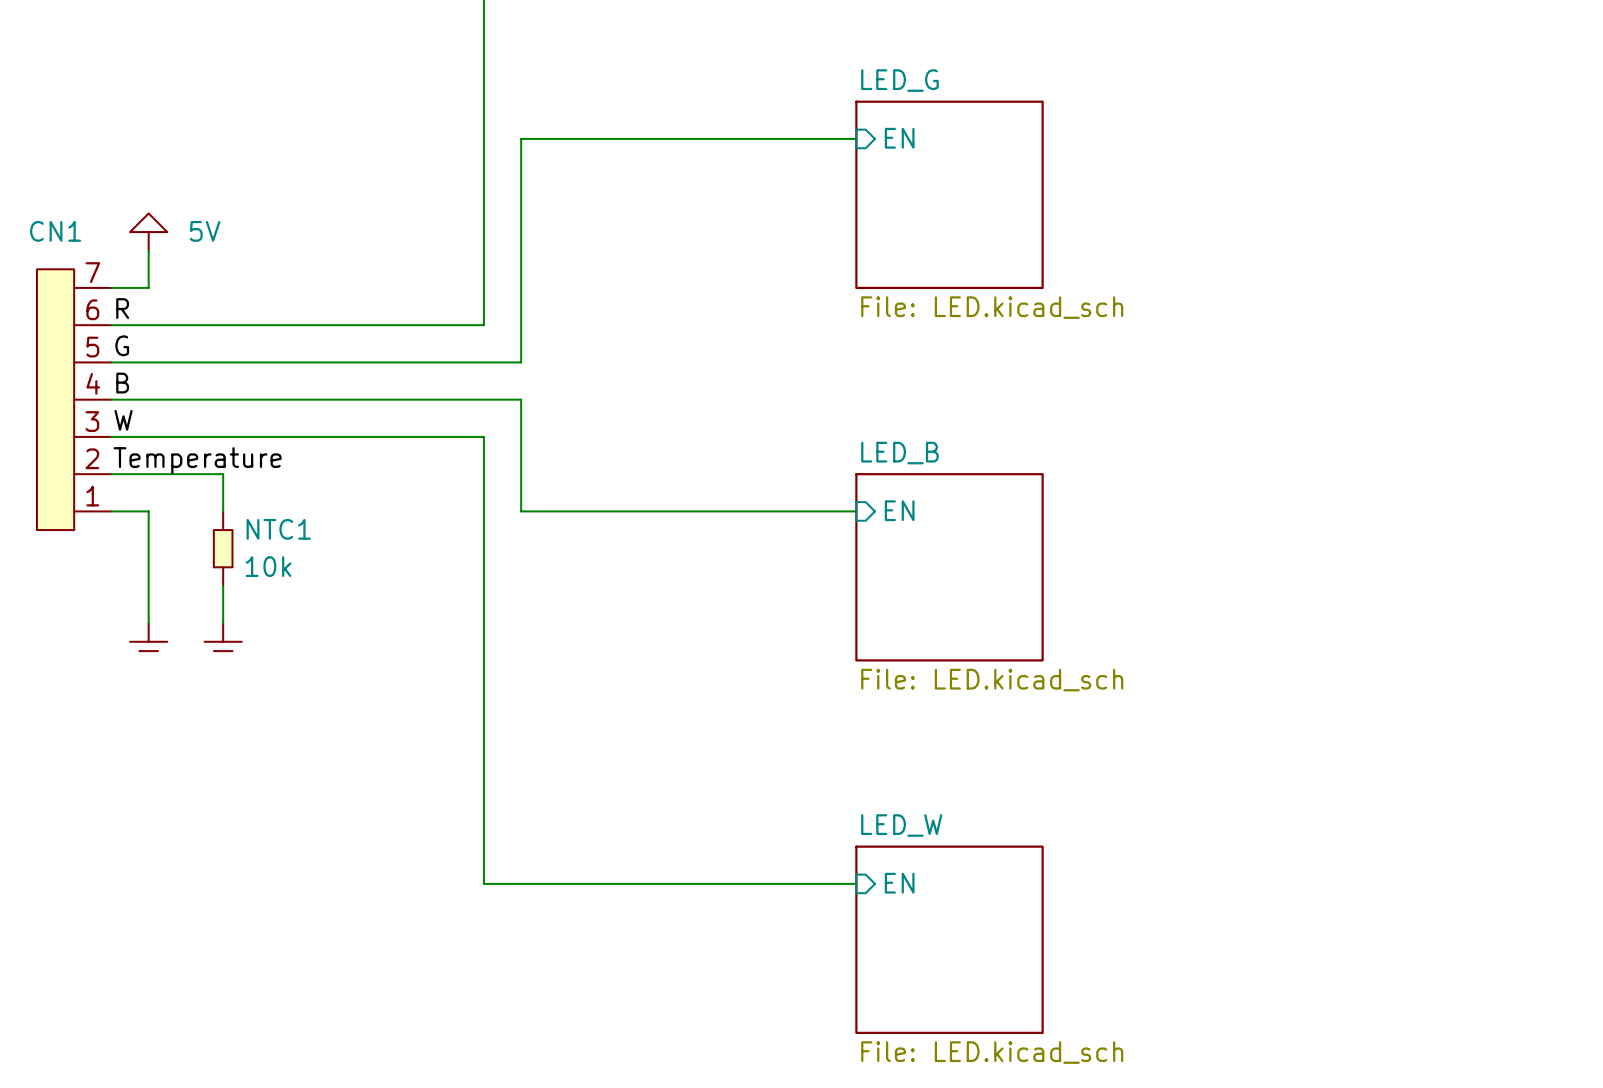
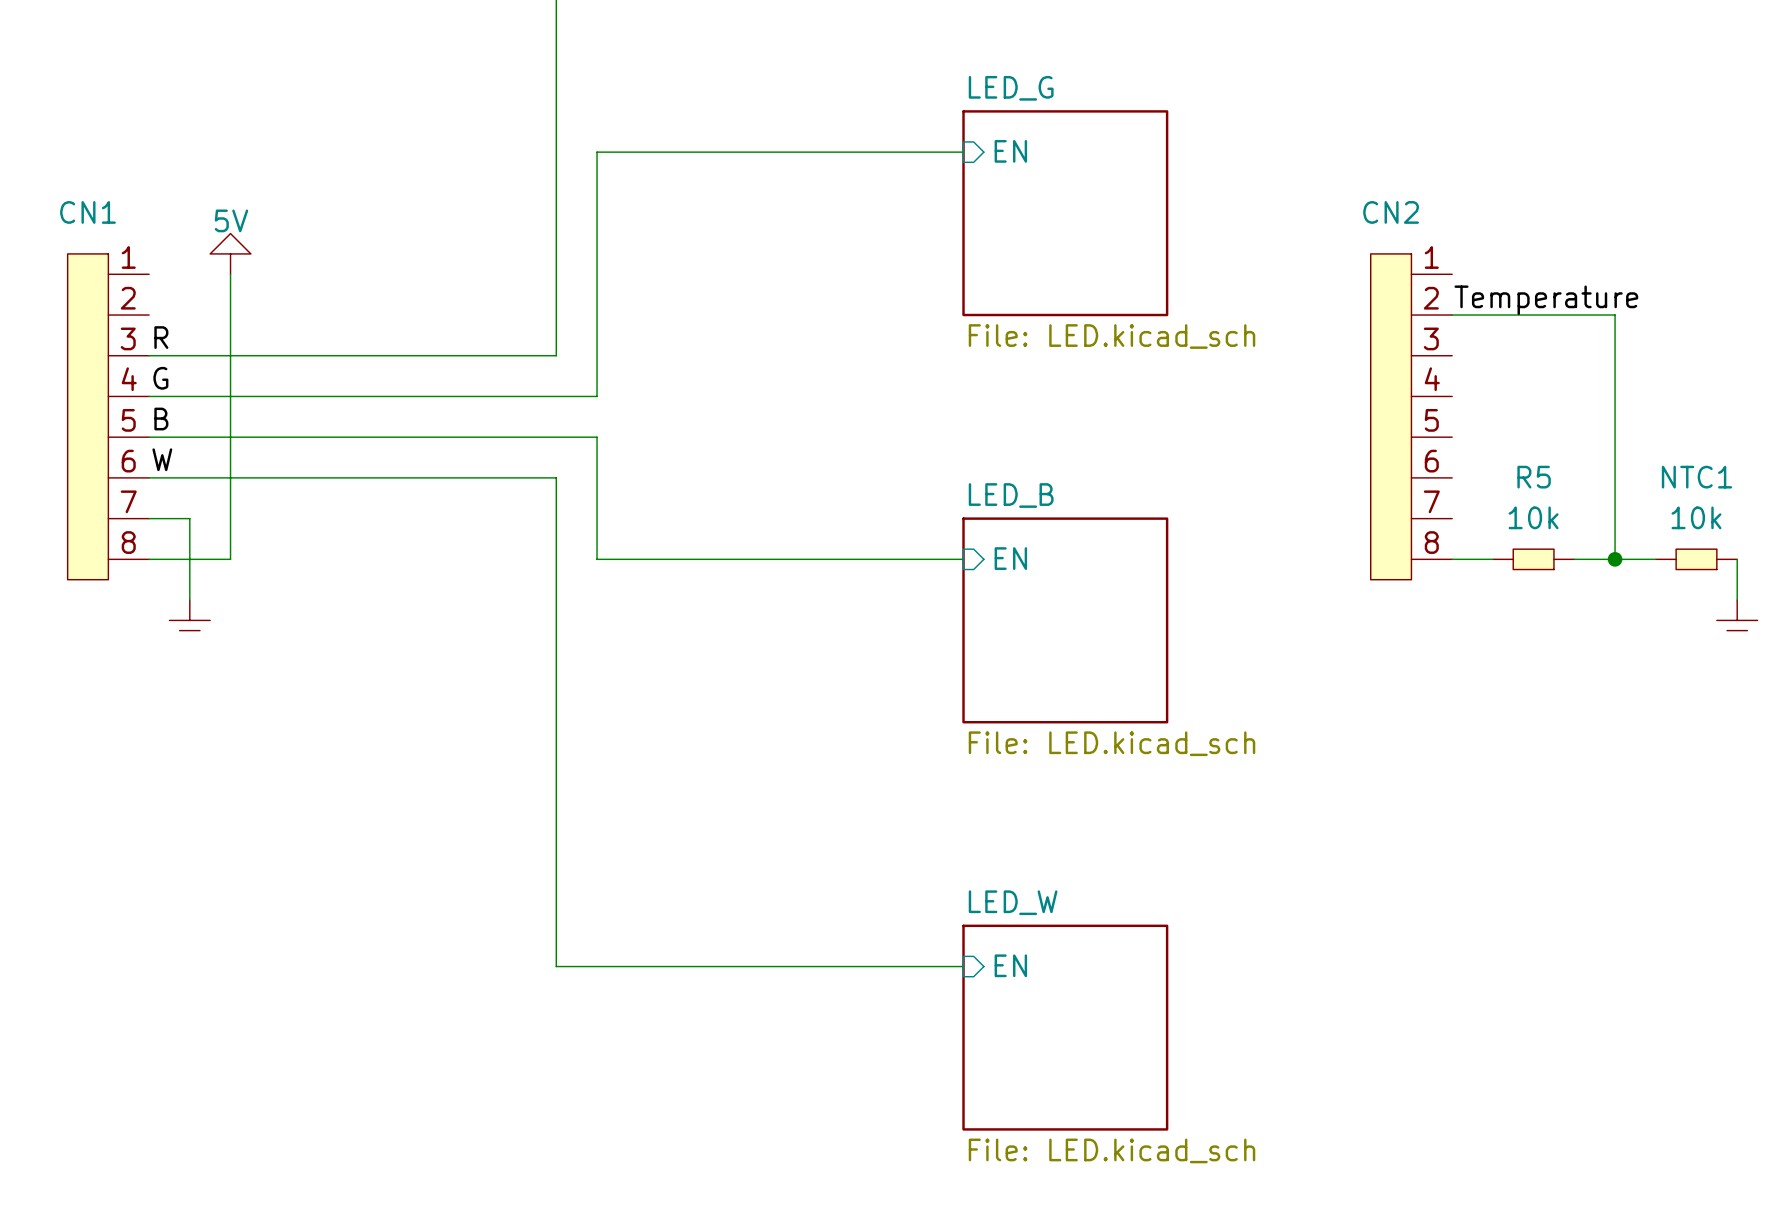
power symbol text position: 5V (205, 231) -> 5V (231, 220)
power symbol position: 5V (148, 232) -> 5V (230, 253)
wire: (148, 250) (148, 287) (111, 287) -> none
CN1 symbol: [36, 269, 112, 531] -> [67, 253, 150, 580]
label: none -> Temperature (1546, 300)
wire: none -> (1452, 315) (1615, 315) (1615, 559)
CN2: none -> (1411, 416)
label: Temperature (197, 460) -> none
wire: (148, 474) (223, 474) (223, 511) -> (189, 518) (189, 559) (230, 559) (230, 274)
wire: none -> (1452, 559) (1492, 559)
R5: none -> 10k (1533, 559)
wire: none -> (1574, 559) (1655, 559)
junction: none -> (1615, 559)
wire: none -> (1737, 559) (1737, 600)
NTC1 name position: NTC1 (278, 529) -> NTC1 (1696, 477)
wire: (148, 548) (148, 623) -> none
NTC1 rotation: 0° (223, 548) -> 90° clockwise (1696, 559)
NTC1 position: (223, 548) -> (1696, 559)
NTC1 value position: 10k (268, 566) -> 10k (1696, 517)
power symbol: none -> (189, 620)
power symbol: none -> (1737, 620)
wire: (223, 585) (223, 623) -> none
power symbol: (148, 641) -> none
power symbol: (223, 641) -> none

